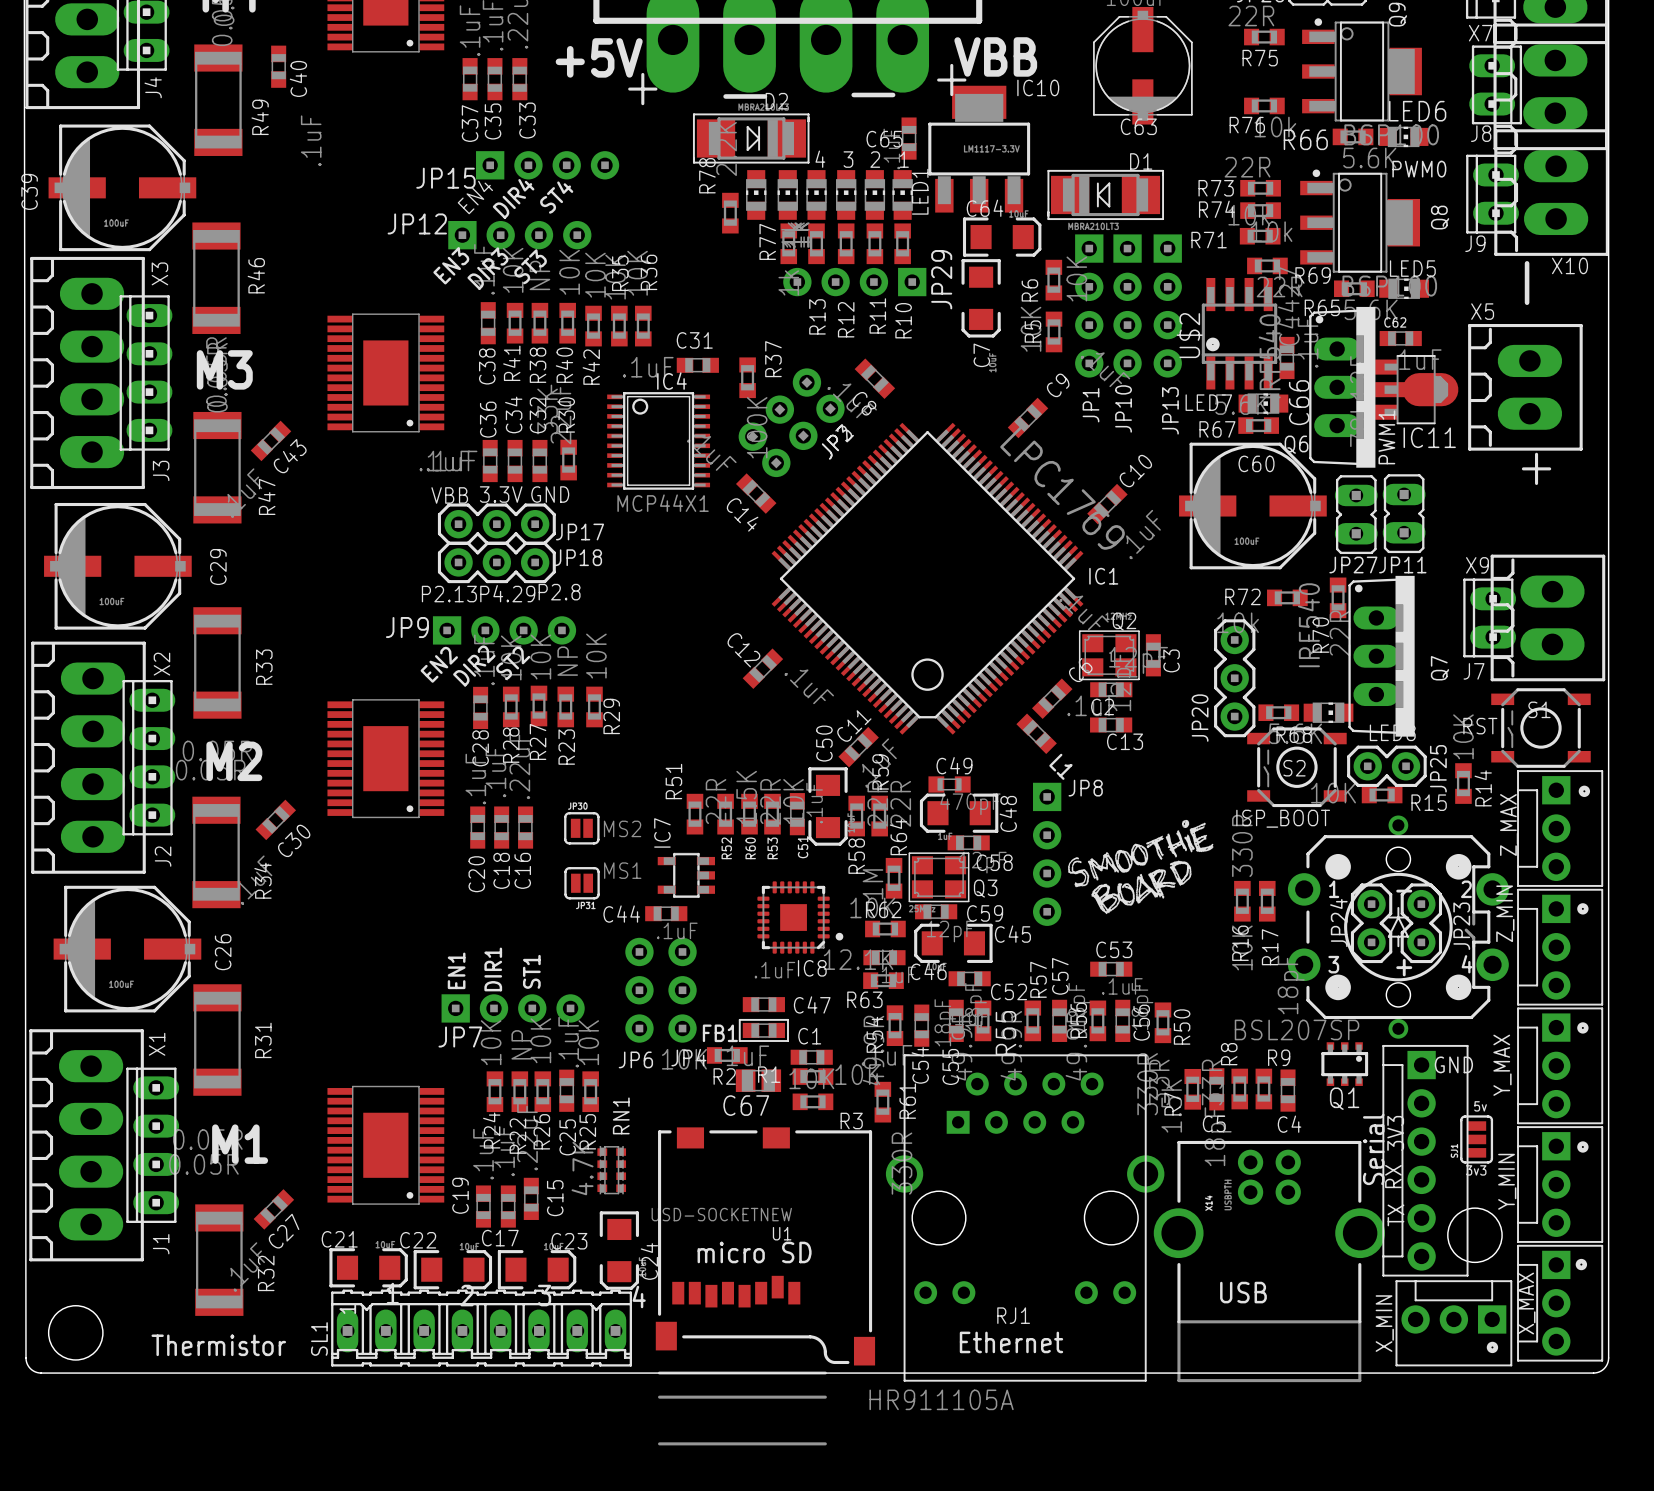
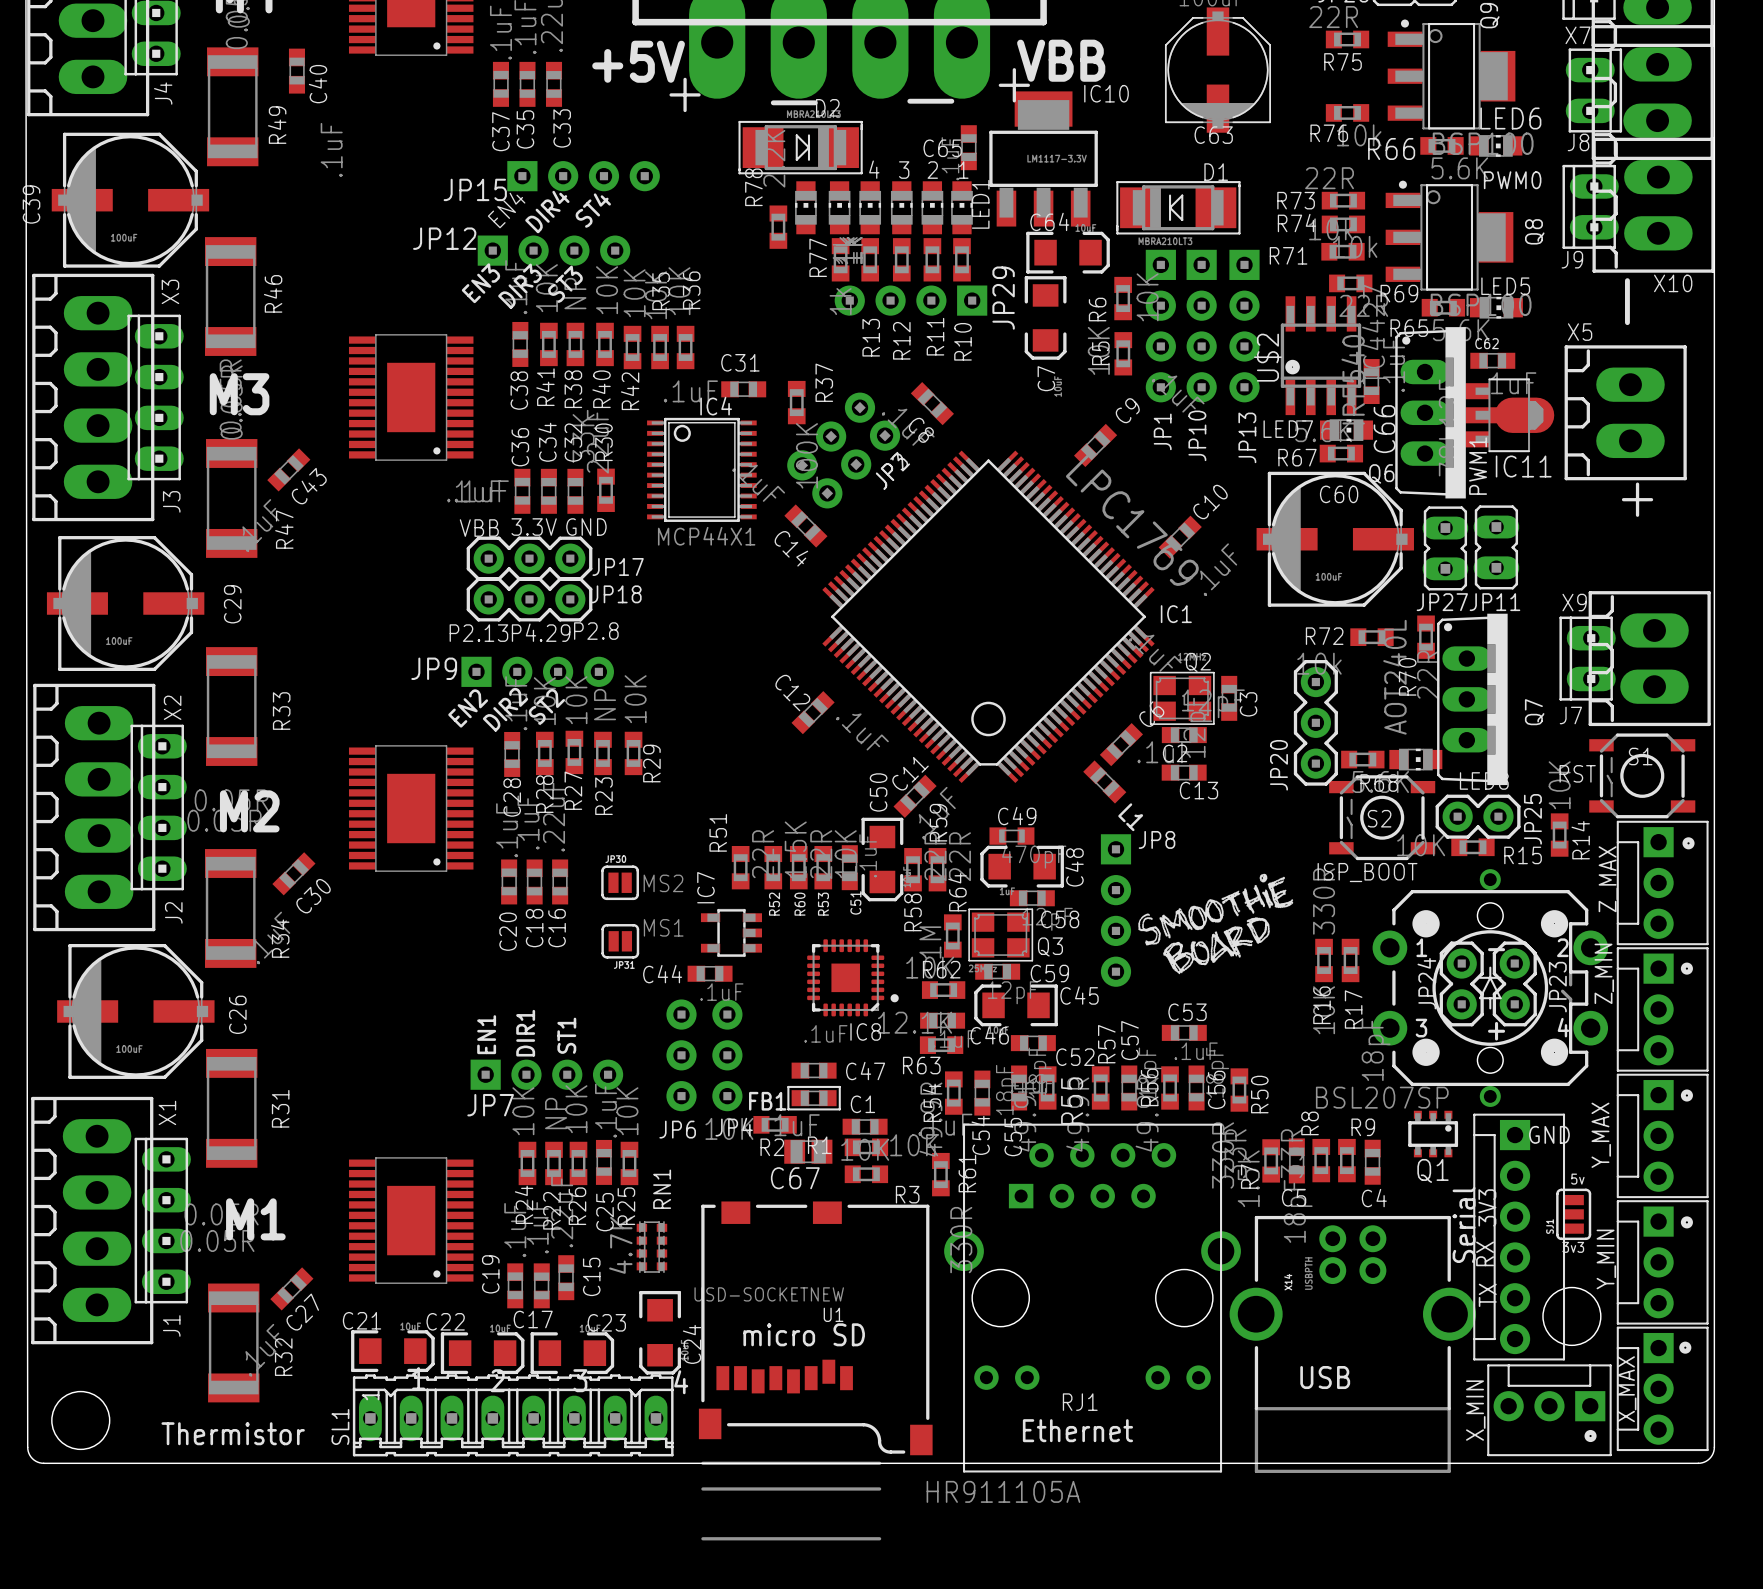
Q7 value: IRF540 (1308, 625) -> AOT240L (1394, 677)

